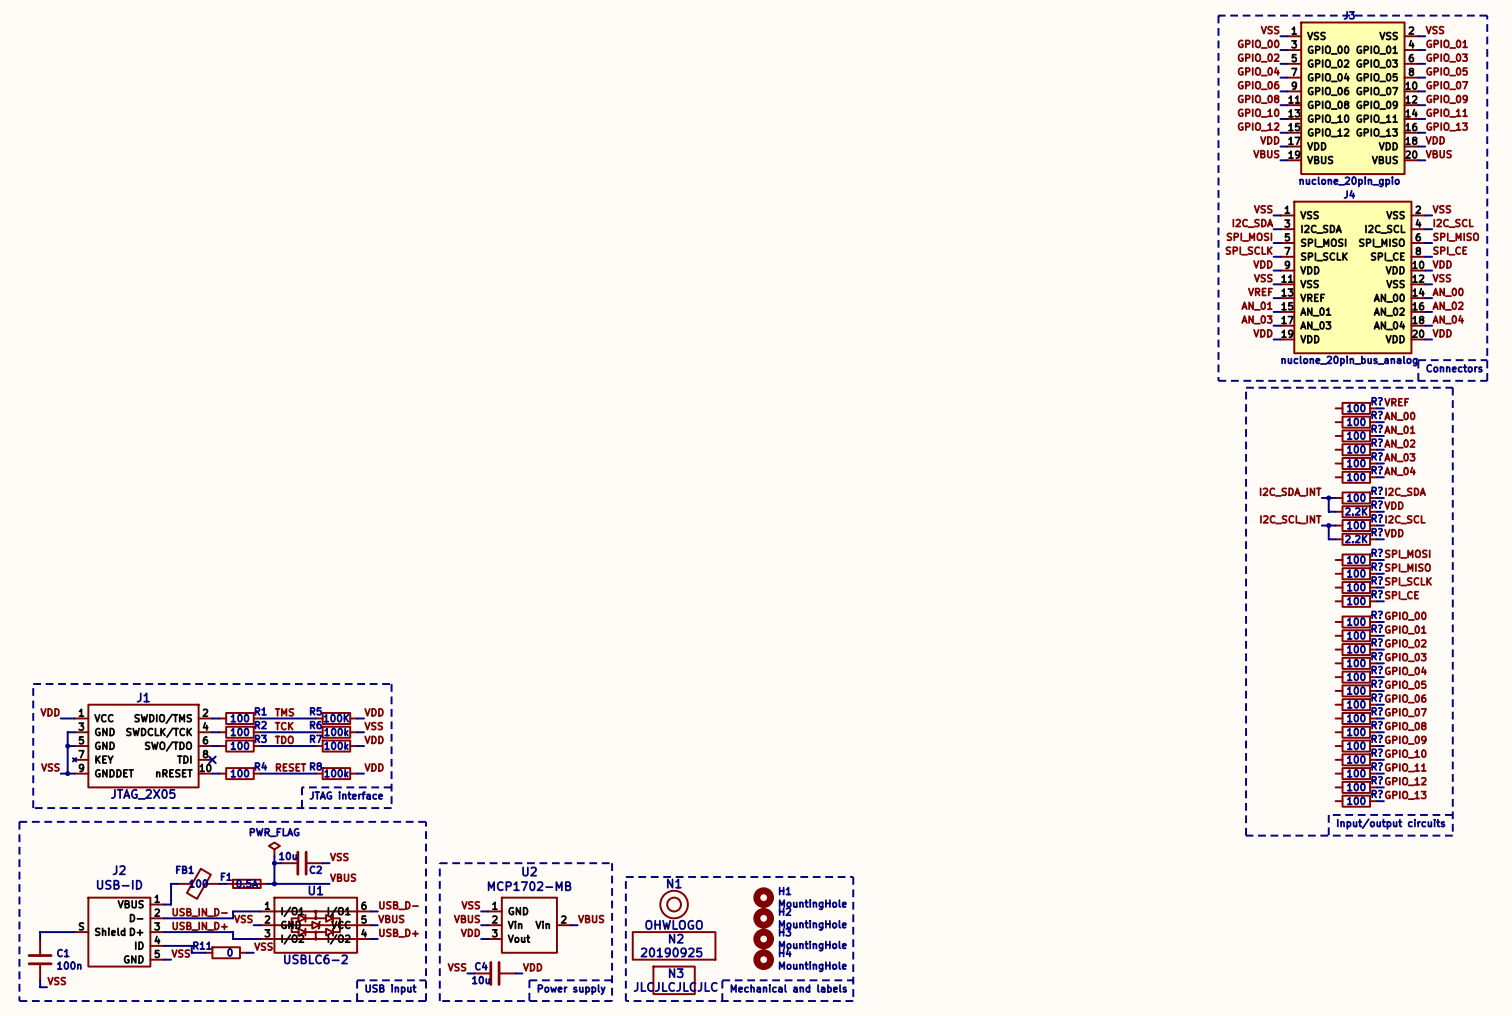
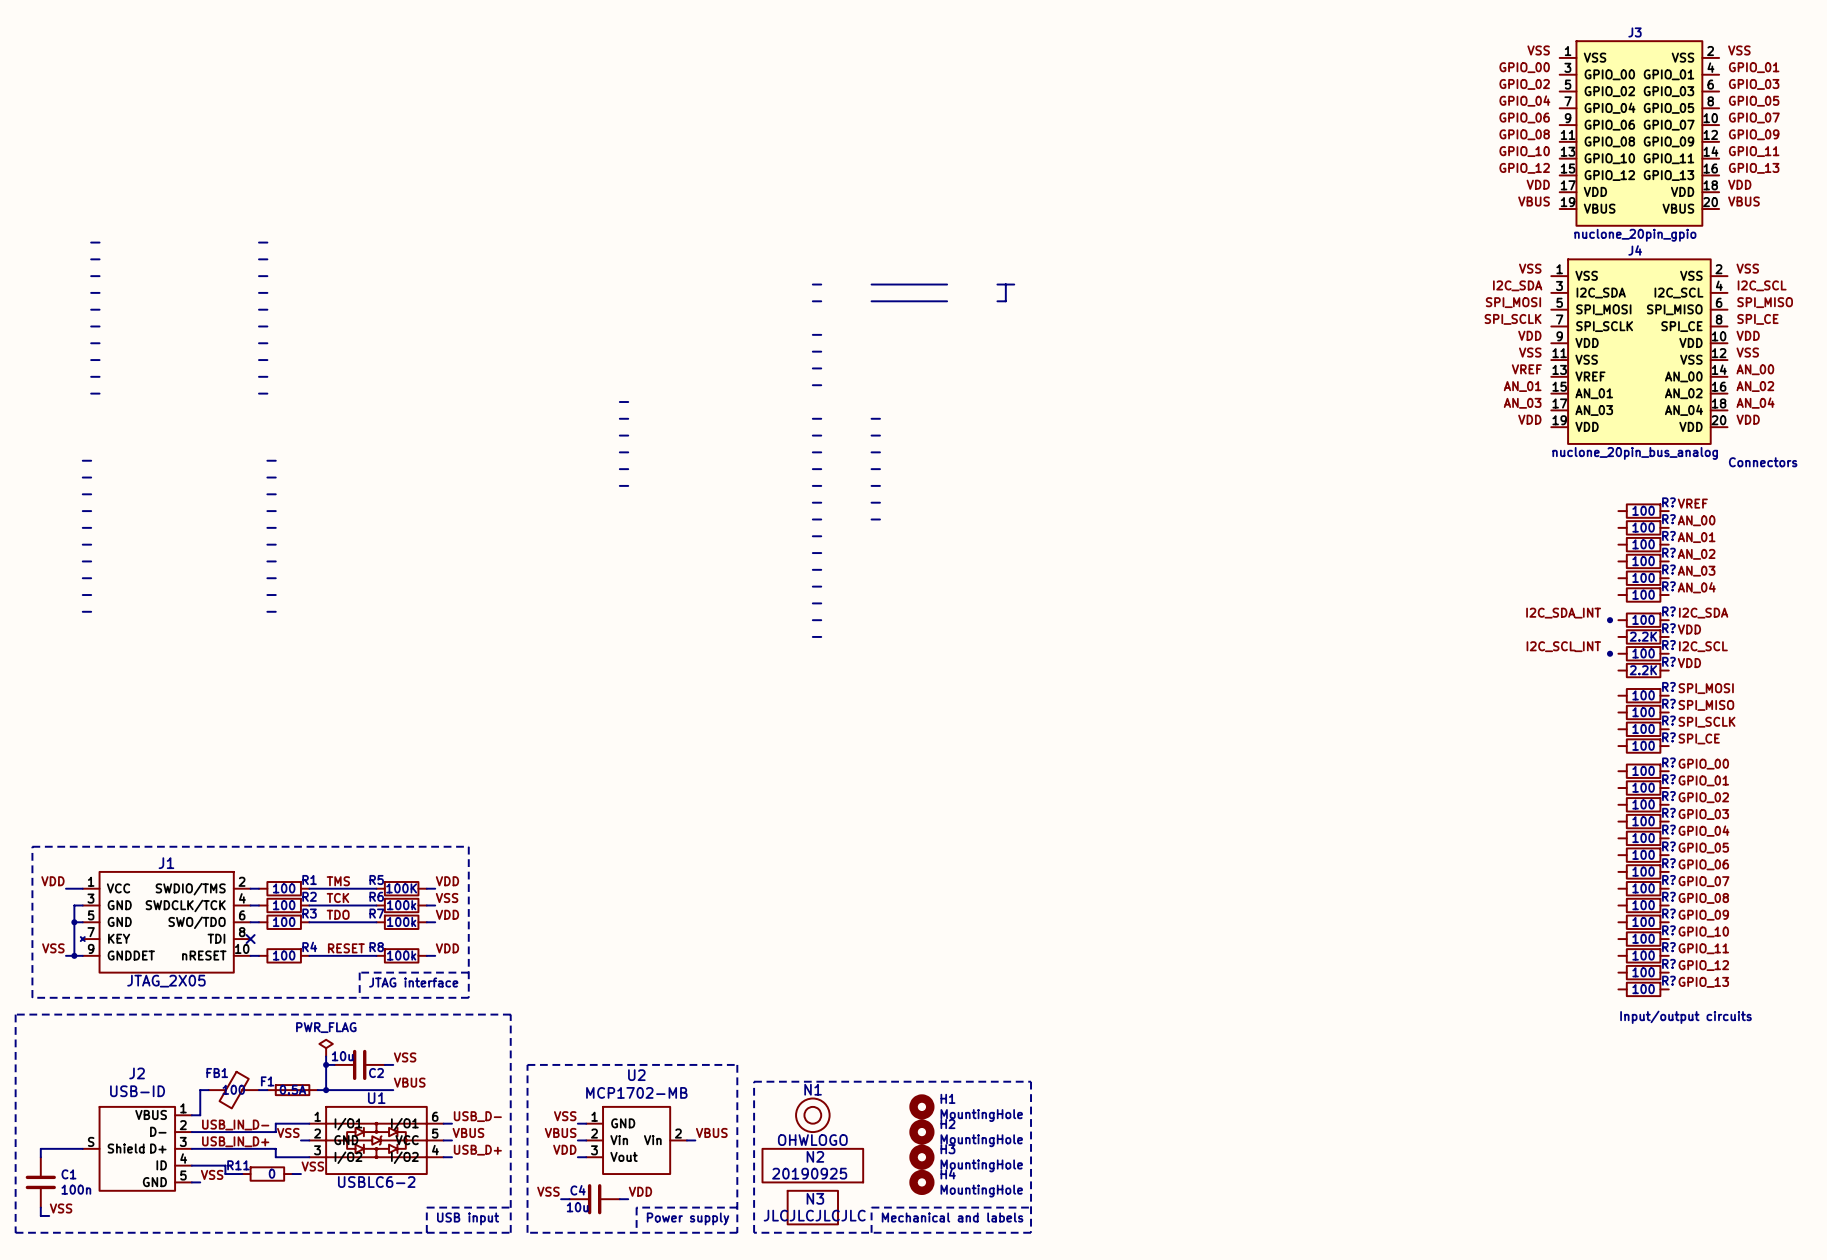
line: (1218, 15) (1487, 15) (1487, 380) (1218, 380) (1218, 15) -> none
wire: (1280, 36) (1287, 36) -> none
wire: (1418, 36) (1425, 36) -> none
wire: (1280, 50) (1287, 50) -> none
wire: (1418, 50) (1425, 50) -> none
wire: (1280, 63) (1287, 63) -> none
wire: (1418, 63) (1425, 63) -> none
wire: (1280, 77) (1287, 77) -> none
wire: (1418, 77) (1425, 77) -> none
wire: (1280, 91) (1287, 91) -> none
wire: (1418, 91) (1425, 91) -> none
wire: (1280, 105) (1287, 105) -> none
wire: (1418, 105) (1425, 105) -> none
wire: (1280, 118) (1287, 118) -> none
wire: (1418, 118) (1425, 118) -> none
wire: (1280, 132) (1287, 132) -> none
wire: (1418, 132) (1425, 132) -> none
wire: (1280, 146) (1287, 146) -> none
wire: (1418, 146) (1425, 146) -> none
wire: (1280, 160) (1287, 160) -> none
wire: (1418, 160) (1425, 160) -> none
wire: none -> (91, 242) (99, 242)
wire: none -> (258, 242) (267, 242)
wire: none -> (91, 259) (99, 259)
wire: none -> (258, 259) (267, 259)
wire: none -> (91, 276) (99, 276)
wire: none -> (258, 276) (267, 276)
wire: (1273, 215) (1280, 215) -> none
wire: (1425, 215) (1432, 215) -> none
wire: none -> (812, 284) (821, 284)
wire: none -> (871, 284) (947, 284)
wire: none -> (997, 284) (1014, 284)
wire: none -> (1005, 284) (1005, 301) (997, 301)
wire: none -> (91, 292) (99, 292)
wire: none -> (258, 292) (267, 292)
wire: (1273, 229) (1280, 229) -> none
wire: (1425, 229) (1432, 229) -> none
wire: none -> (812, 301) (821, 301)
wire: none -> (871, 301) (947, 301)
wire: none -> (91, 309) (99, 309)
wire: none -> (258, 309) (267, 309)
wire: (1273, 243) (1280, 243) -> none
wire: (1425, 243) (1432, 243) -> none
wire: none -> (91, 326) (99, 326)
wire: none -> (258, 326) (267, 326)
wire: (1273, 256) (1280, 256) -> none
wire: (1425, 256) (1432, 256) -> none
wire: none -> (812, 334) (821, 334)
wire: none -> (91, 343) (99, 343)
wire: none -> (258, 343) (267, 343)
wire: (1273, 270) (1280, 270) -> none
wire: (1425, 270) (1432, 270) -> none
wire: none -> (812, 351) (821, 351)
wire: none -> (91, 360) (99, 360)
wire: none -> (258, 360) (267, 360)
wire: (1273, 284) (1280, 284) -> none
wire: (1425, 284) (1432, 284) -> none
wire: none -> (812, 368) (821, 368)
wire: none -> (91, 376) (99, 376)
wire: none -> (258, 376) (267, 376)
wire: (1273, 298) (1280, 298) -> none
wire: (1425, 298) (1432, 298) -> none
wire: none -> (812, 385) (821, 385)
wire: none -> (91, 393) (99, 393)
wire: none -> (258, 393) (267, 393)
wire: (1273, 311) (1280, 311) -> none
wire: (1425, 311) (1432, 311) -> none
wire: none -> (619, 402) (628, 402)
wire: (1273, 325) (1280, 325) -> none
wire: (1425, 325) (1432, 325) -> none
wire: none -> (619, 418) (628, 418)
wire: none -> (812, 418) (821, 418)
wire: none -> (871, 418) (879, 418)
wire: (1273, 339) (1280, 339) -> none
wire: (1425, 339) (1432, 339) -> none
wire: none -> (619, 435) (628, 435)
wire: none -> (812, 435) (821, 435)
wire: none -> (871, 435) (879, 435)
wire: none -> (619, 452) (628, 452)
wire: none -> (812, 452) (821, 452)
wire: none -> (871, 452) (879, 452)
line: (1487, 360) (1418, 360) (1418, 380) -> none
wire: none -> (82, 460) (91, 460)
wire: none -> (267, 460) (275, 460)
wire: none -> (619, 469) (628, 469)
wire: none -> (812, 469) (821, 469)
wire: none -> (871, 469) (879, 469)
wire: none -> (82, 477) (91, 477)
wire: none -> (267, 477) (275, 477)
wire: none -> (619, 485) (628, 485)
wire: none -> (812, 485) (821, 485)
wire: none -> (871, 485) (879, 485)
line: (1246, 387) (1452, 387) (1452, 835) (1246, 835) (1246, 387) -> none
wire: none -> (82, 494) (91, 494)
wire: none -> (267, 494) (275, 494)
wire: none -> (812, 502) (821, 502)
wire: none -> (871, 502) (879, 502)
wire: none -> (82, 511) (91, 511)
wire: none -> (267, 511) (275, 511)
wire: (1376, 408) (1383, 408) -> none
wire: none -> (812, 519) (821, 519)
wire: none -> (871, 519) (879, 519)
wire: none -> (82, 527) (91, 527)
wire: none -> (267, 527) (275, 527)
wire: (1376, 422) (1383, 422) -> none
wire: none -> (812, 536) (821, 536)
wire: none -> (82, 544) (91, 544)
wire: none -> (267, 544) (275, 544)
wire: (1376, 435) (1383, 435) -> none
wire: none -> (812, 553) (821, 553)
wire: none -> (82, 561) (91, 561)
wire: none -> (267, 561) (275, 561)
wire: (1376, 449) (1383, 449) -> none
wire: none -> (812, 569) (821, 569)
wire: none -> (82, 578) (91, 578)
wire: none -> (267, 578) (275, 578)
wire: (1376, 463) (1383, 463) -> none
wire: none -> (812, 586) (821, 586)
wire: none -> (82, 595) (91, 595)
wire: none -> (267, 595) (275, 595)
wire: (1376, 477) (1383, 477) -> none
wire: none -> (812, 603) (821, 603)
wire: none -> (82, 611) (91, 611)
wire: none -> (267, 611) (275, 611)
wire: none -> (812, 620) (821, 620)
wire: (1321, 497) (1335, 497) -> none
wire: (1328, 497) (1328, 511) (1335, 511) -> none
wire: (1376, 497) (1383, 497) -> none
wire: none -> (812, 636) (821, 636)
wire: (1376, 511) (1383, 511) -> none
wire: (1321, 525) (1335, 525) -> none
wire: (1328, 525) (1328, 539) (1335, 539) -> none
wire: (1376, 525) (1383, 525) -> none
wire: (1376, 539) (1383, 539) -> none
wire: (1376, 559) (1383, 559) -> none
wire: (1376, 573) (1383, 573) -> none
wire: (1376, 587) (1383, 587) -> none
wire: (1376, 601) (1383, 601) -> none
wire: (1376, 622) (1383, 622) -> none
wire: (1376, 635) (1383, 635) -> none
wire: (1376, 649) (1383, 649) -> none
wire: (1376, 663) (1383, 663) -> none
wire: (1376, 677) (1383, 677) -> none
wire: (1376, 690) (1383, 690) -> none
wire: (1376, 704) (1383, 704) -> none
wire: (1376, 718) (1383, 718) -> none
wire: (1376, 732) (1383, 732) -> none
wire: (1376, 746) (1383, 746) -> none
wire: (1376, 759) (1383, 759) -> none
wire: (1376, 773) (1383, 773) -> none
wire: (1376, 787) (1383, 787) -> none
wire: (1376, 801) (1383, 801) -> none
line: (1452, 814) (1328, 814) (1328, 835) -> none

